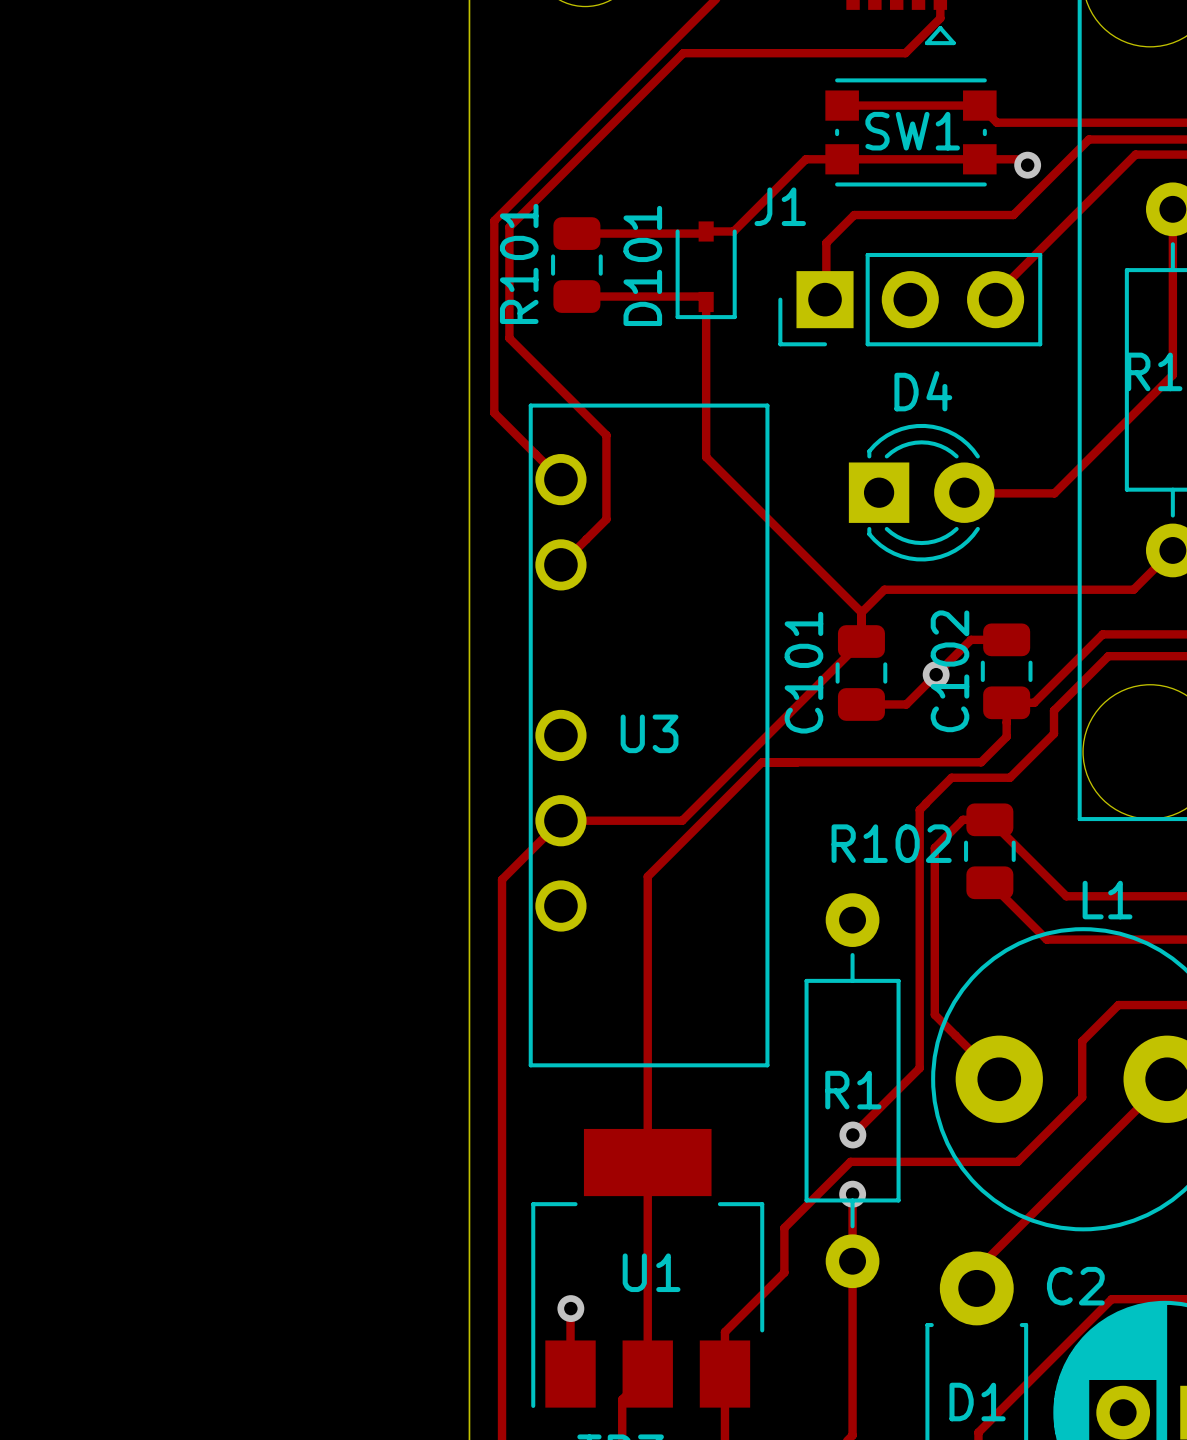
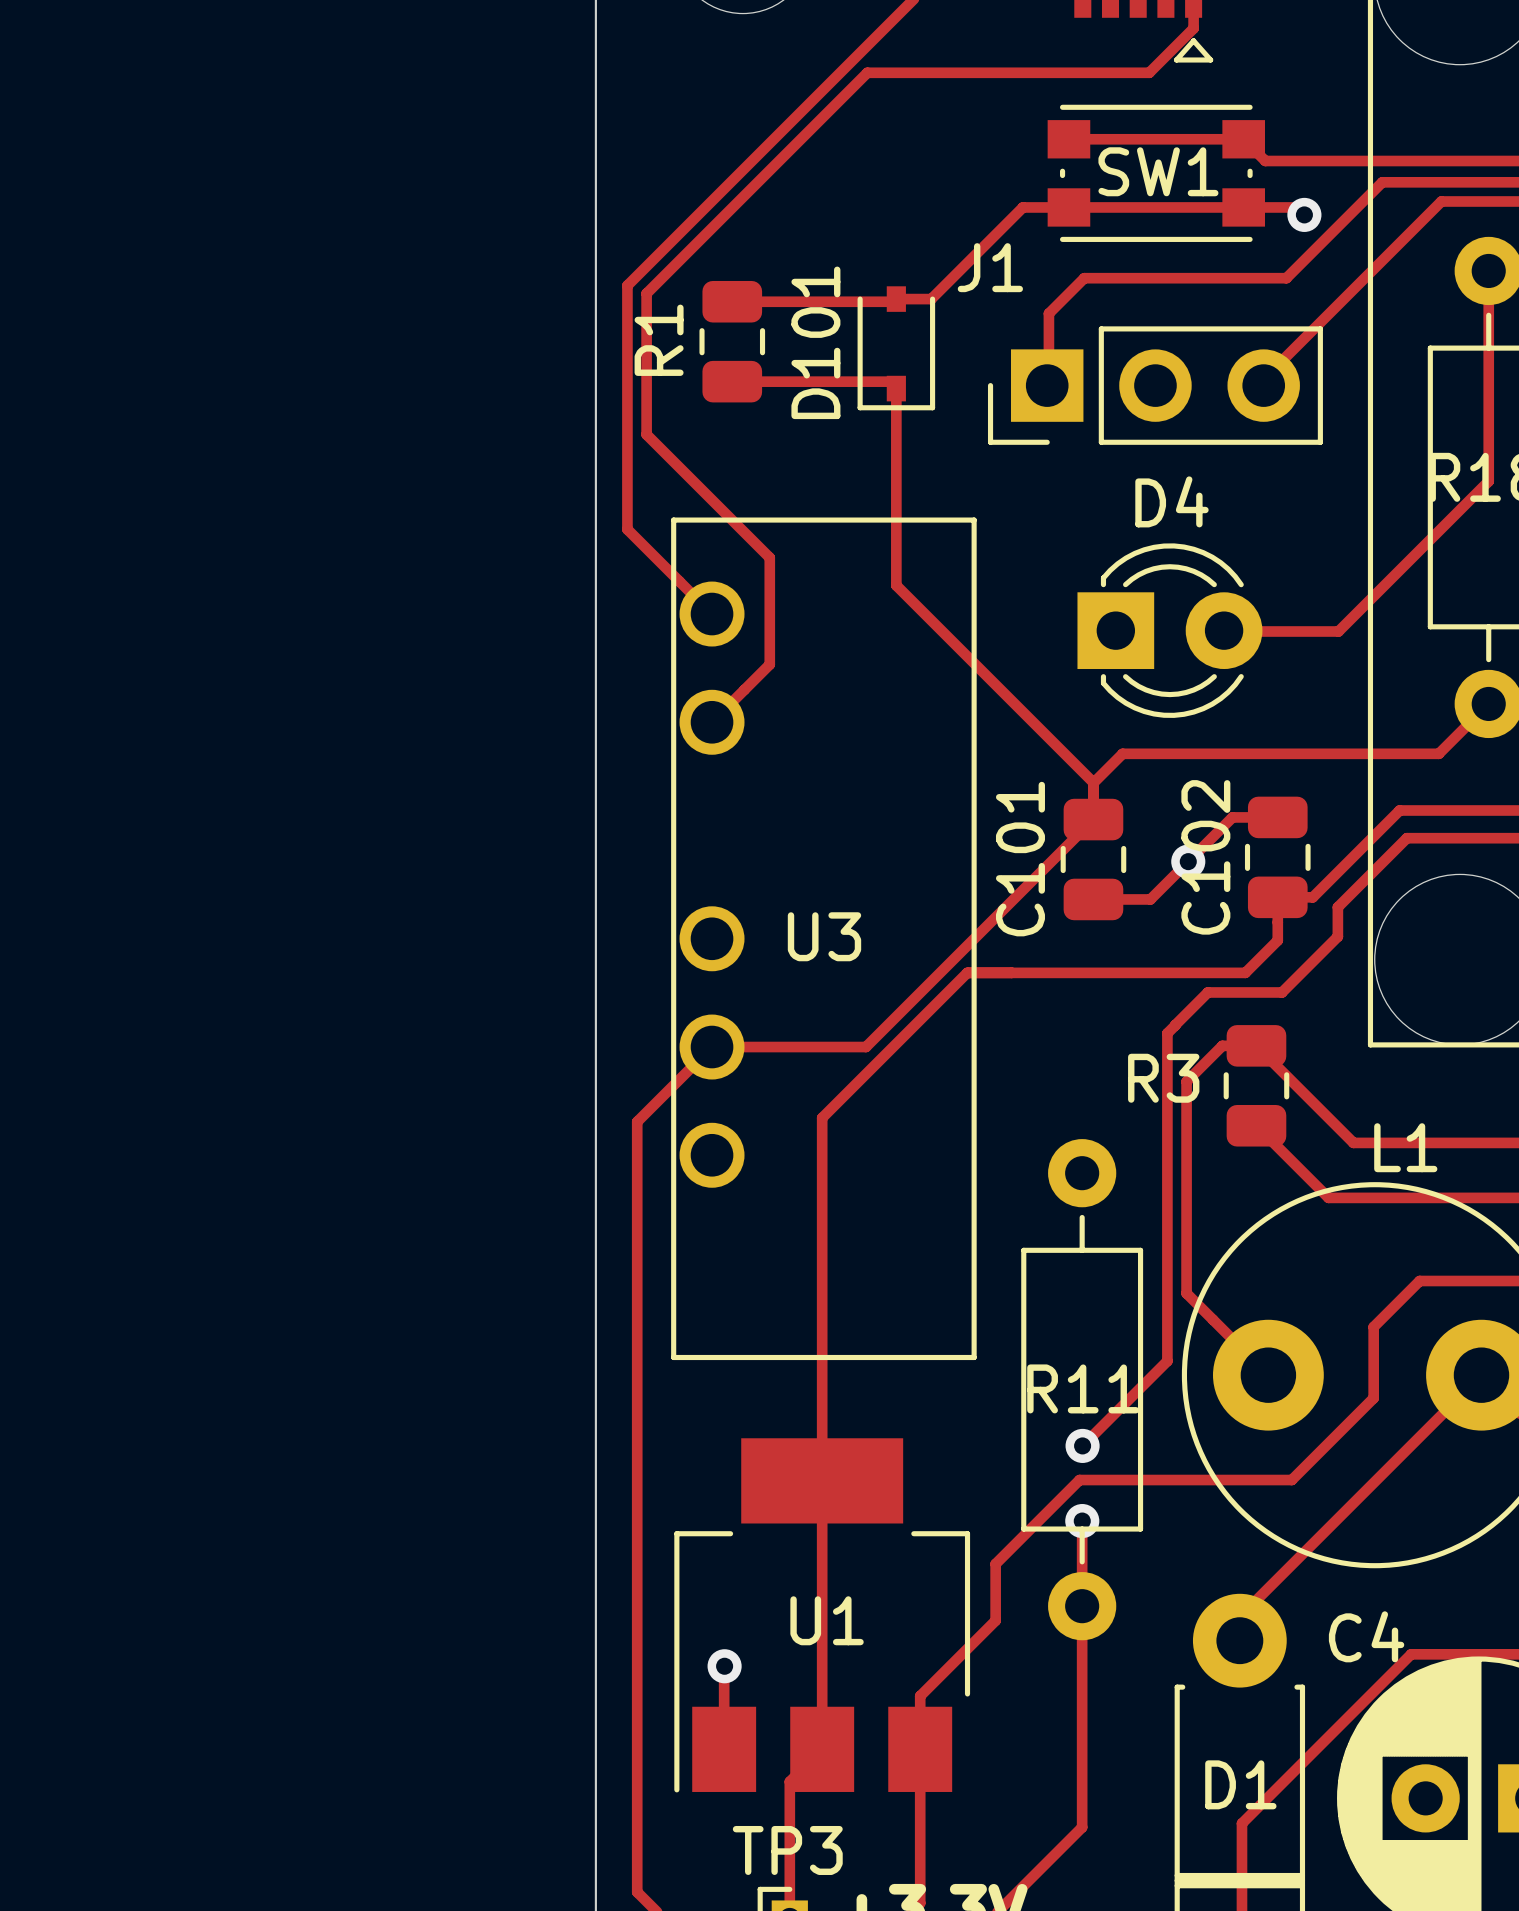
R101 name: R101 (519, 263) -> R1 (659, 340)
R102 name: R102 (891, 843) -> R3 (1163, 1078)
R1 name: R1 (853, 1090) -> R11 (1083, 1388)
C2 name: C2 (1075, 1286) -> C4 (1366, 1636)

